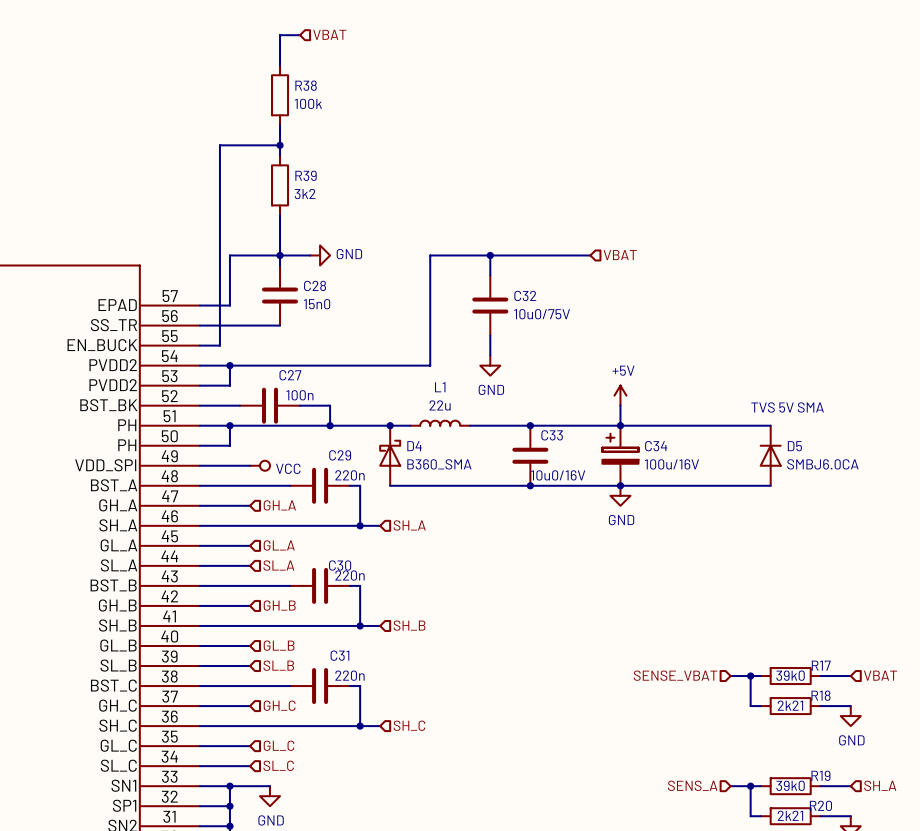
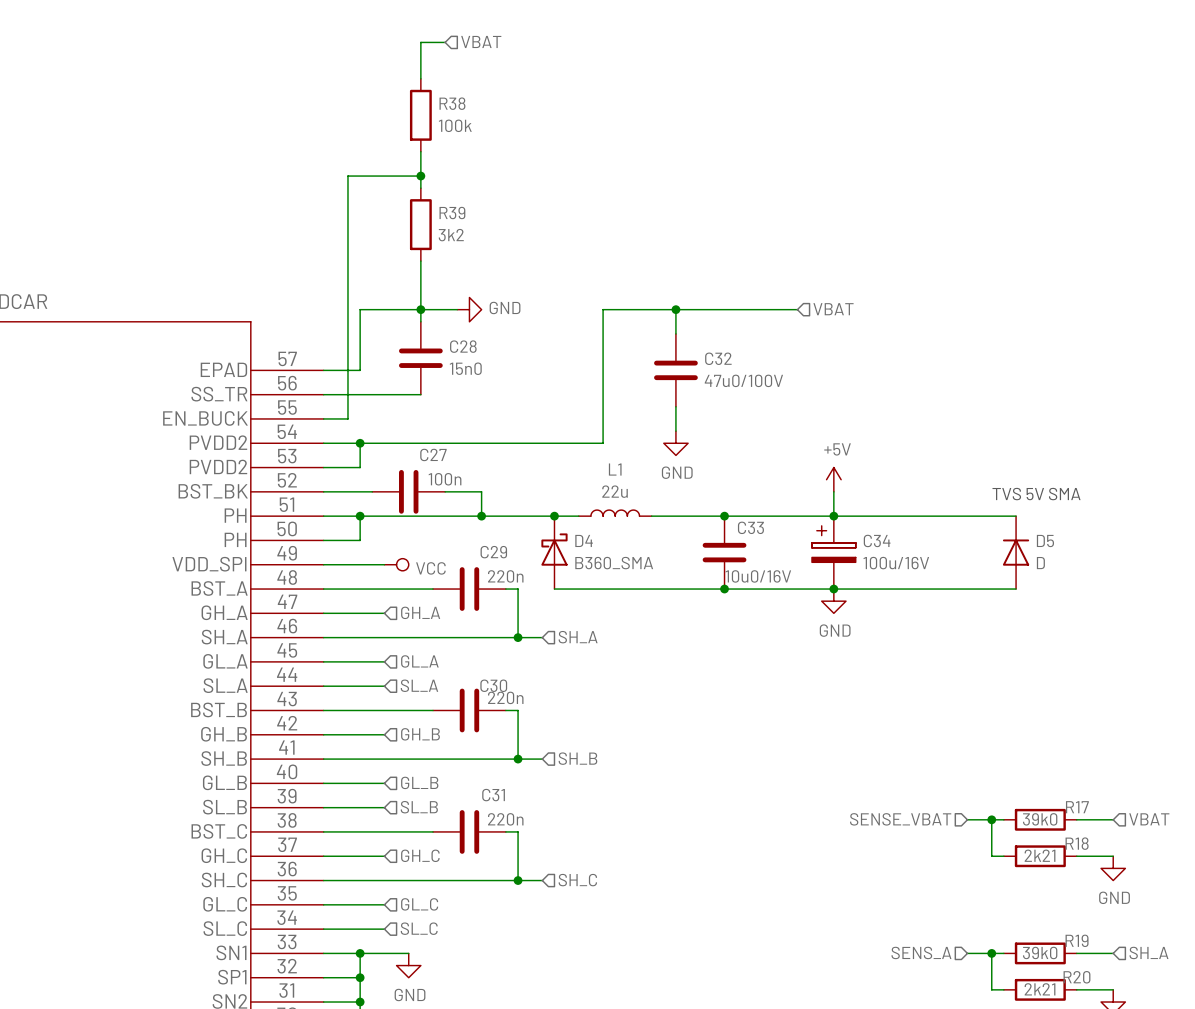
C32 value: 10u0/75V (542, 314) -> 47u0/100V (743, 380)
D5 value: SMBJ6.0CA (822, 464) -> D (1040, 563)

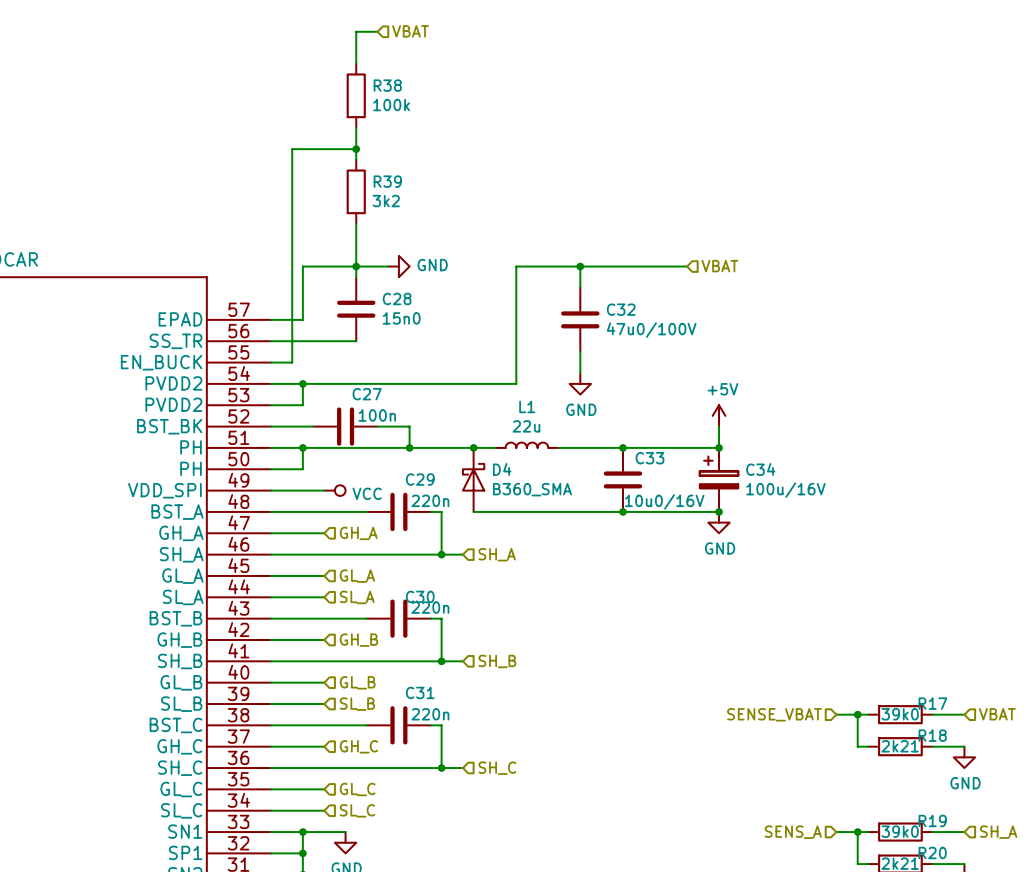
text: TVS 5V SMA (1036, 494) -> none
wire: (833, 516) (1016, 516) -> none
D5: D (1016, 552) -> none
wire: (833, 589) (1016, 589) -> none

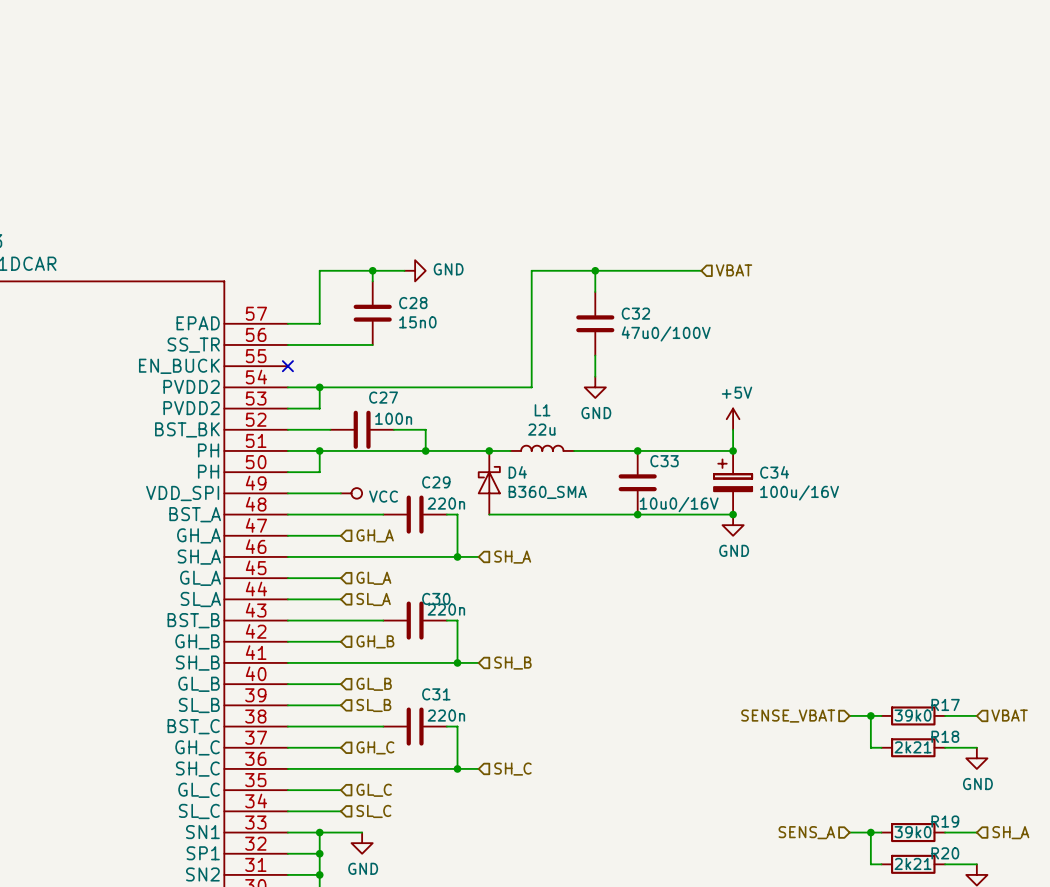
wire: (377, 31) (356, 31) (356, 63) -> none
hierarchical label: VBAT (410, 31) -> none
R38: 100k (356, 95) -> none
wire: (356, 127) (356, 159) -> none
wire: (356, 149) (292, 149) (292, 362) (270, 362) -> none
junction: (356, 149) -> none
R39: 3k2 (356, 191) -> none
wire: (356, 223) (356, 266) -> none
no-connect mark: none -> (287, 366)

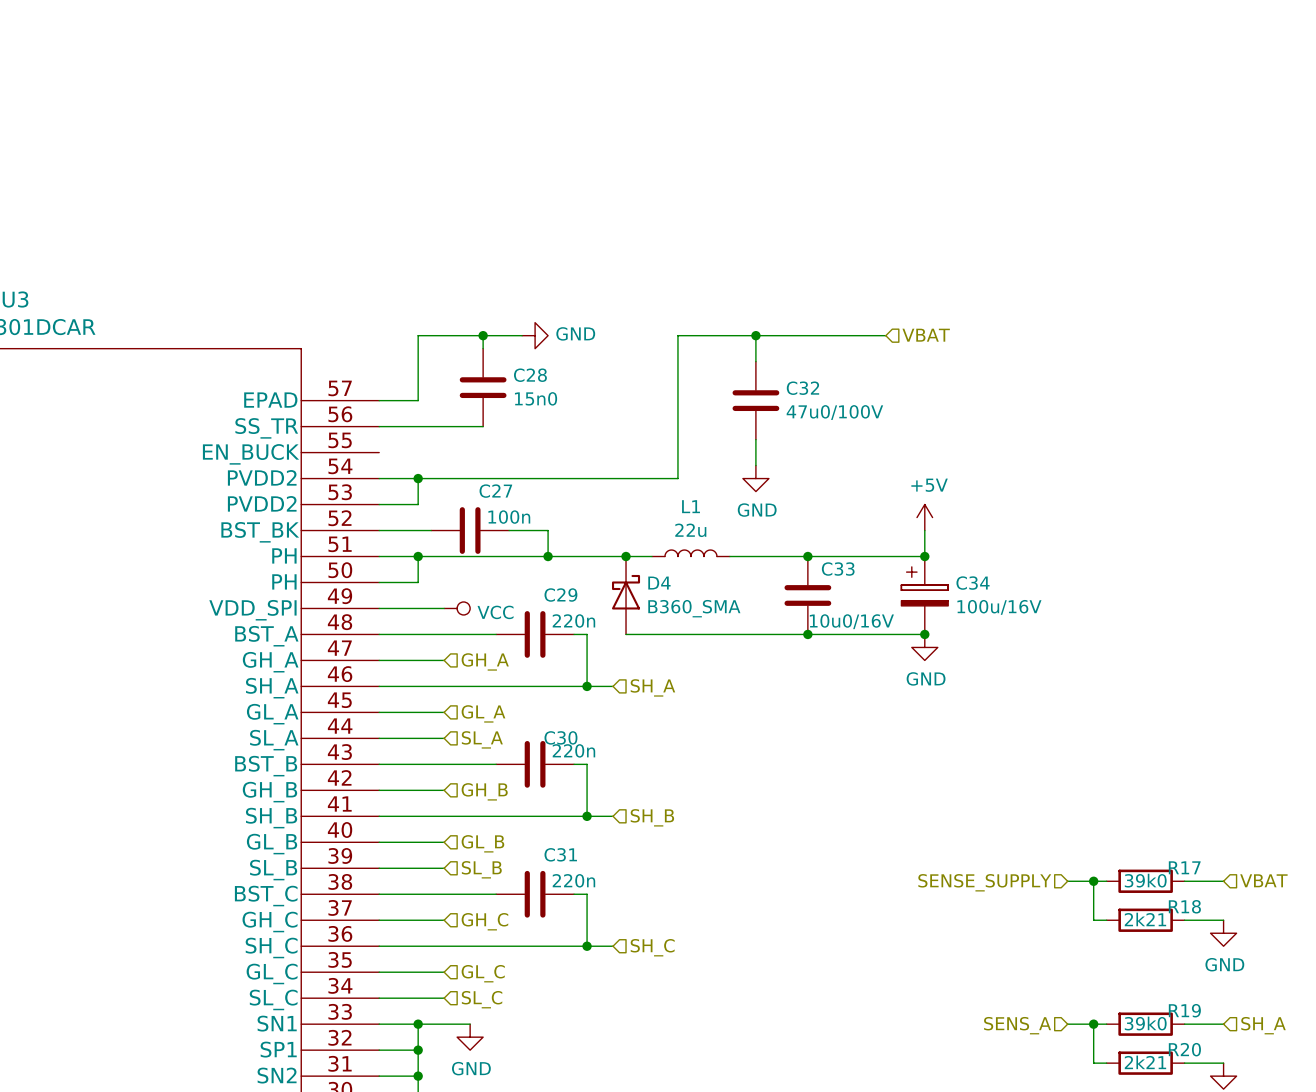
no-connect mark: (287, 366) -> none
hierarchical label: SENSE_VBAT (788, 716) -> SENSE_SUPPLY (984, 882)

